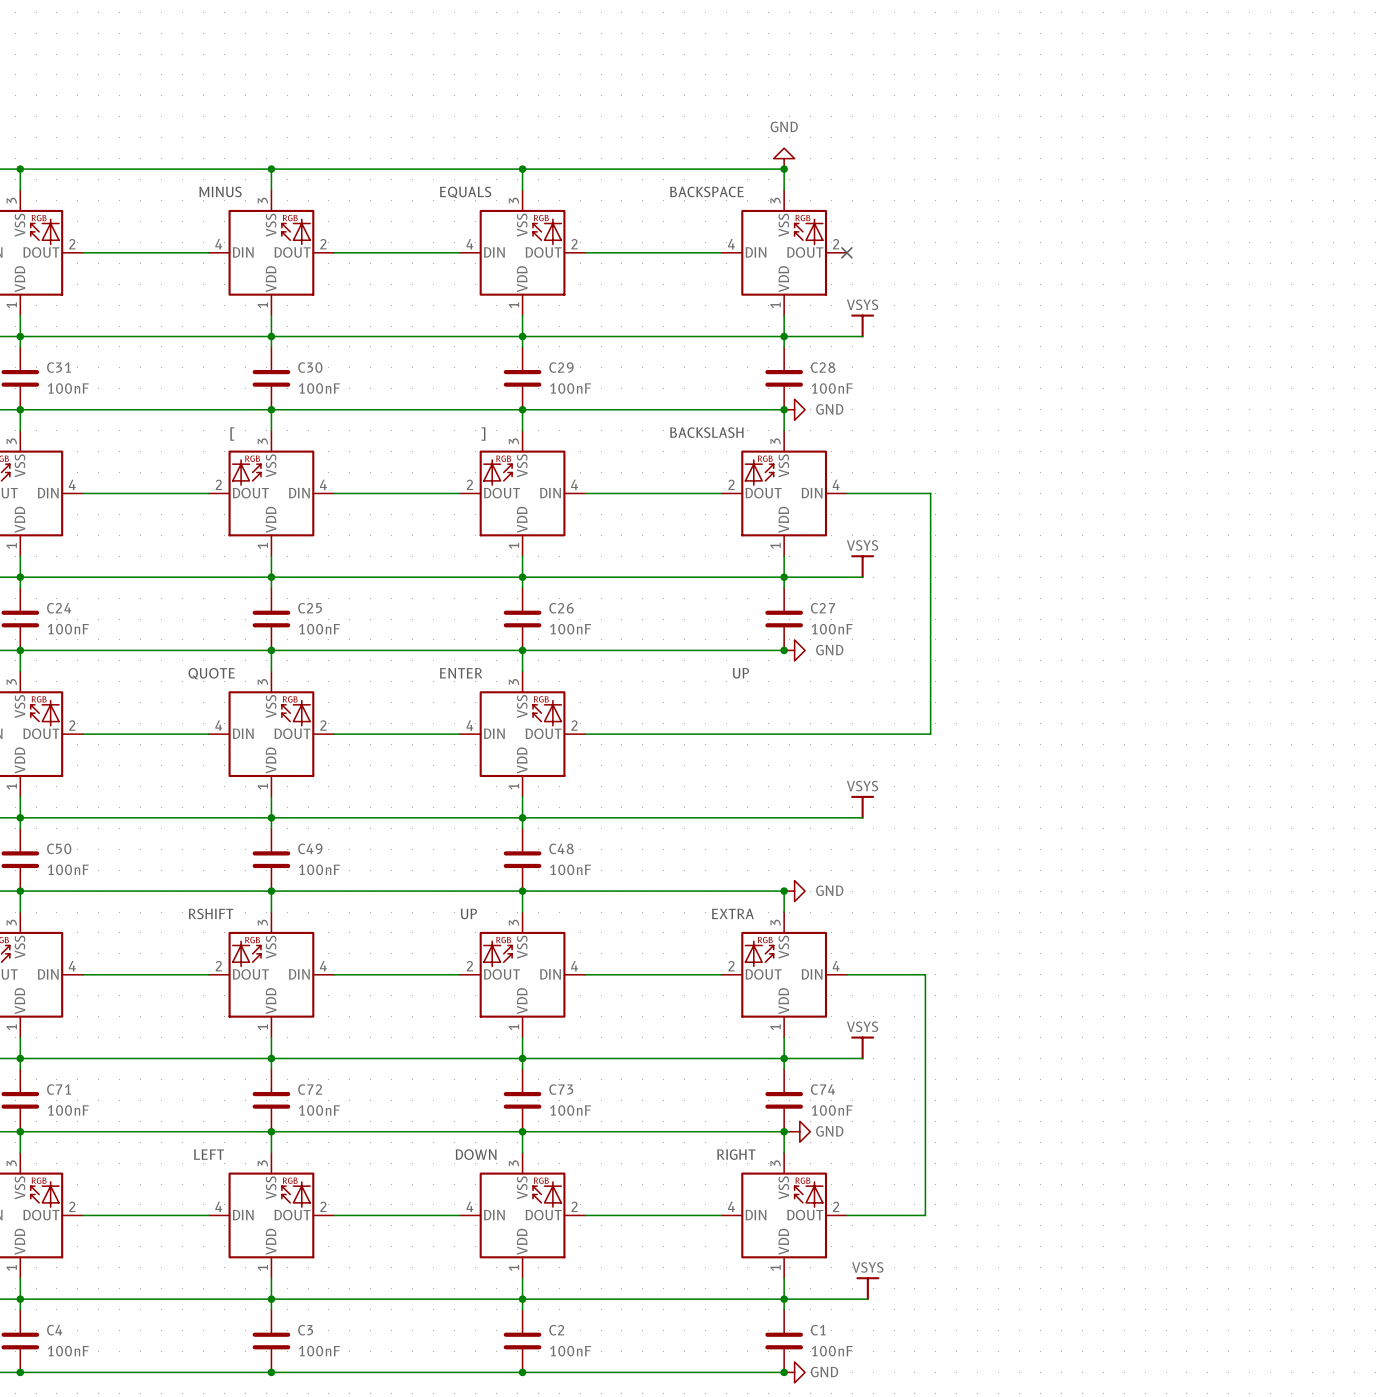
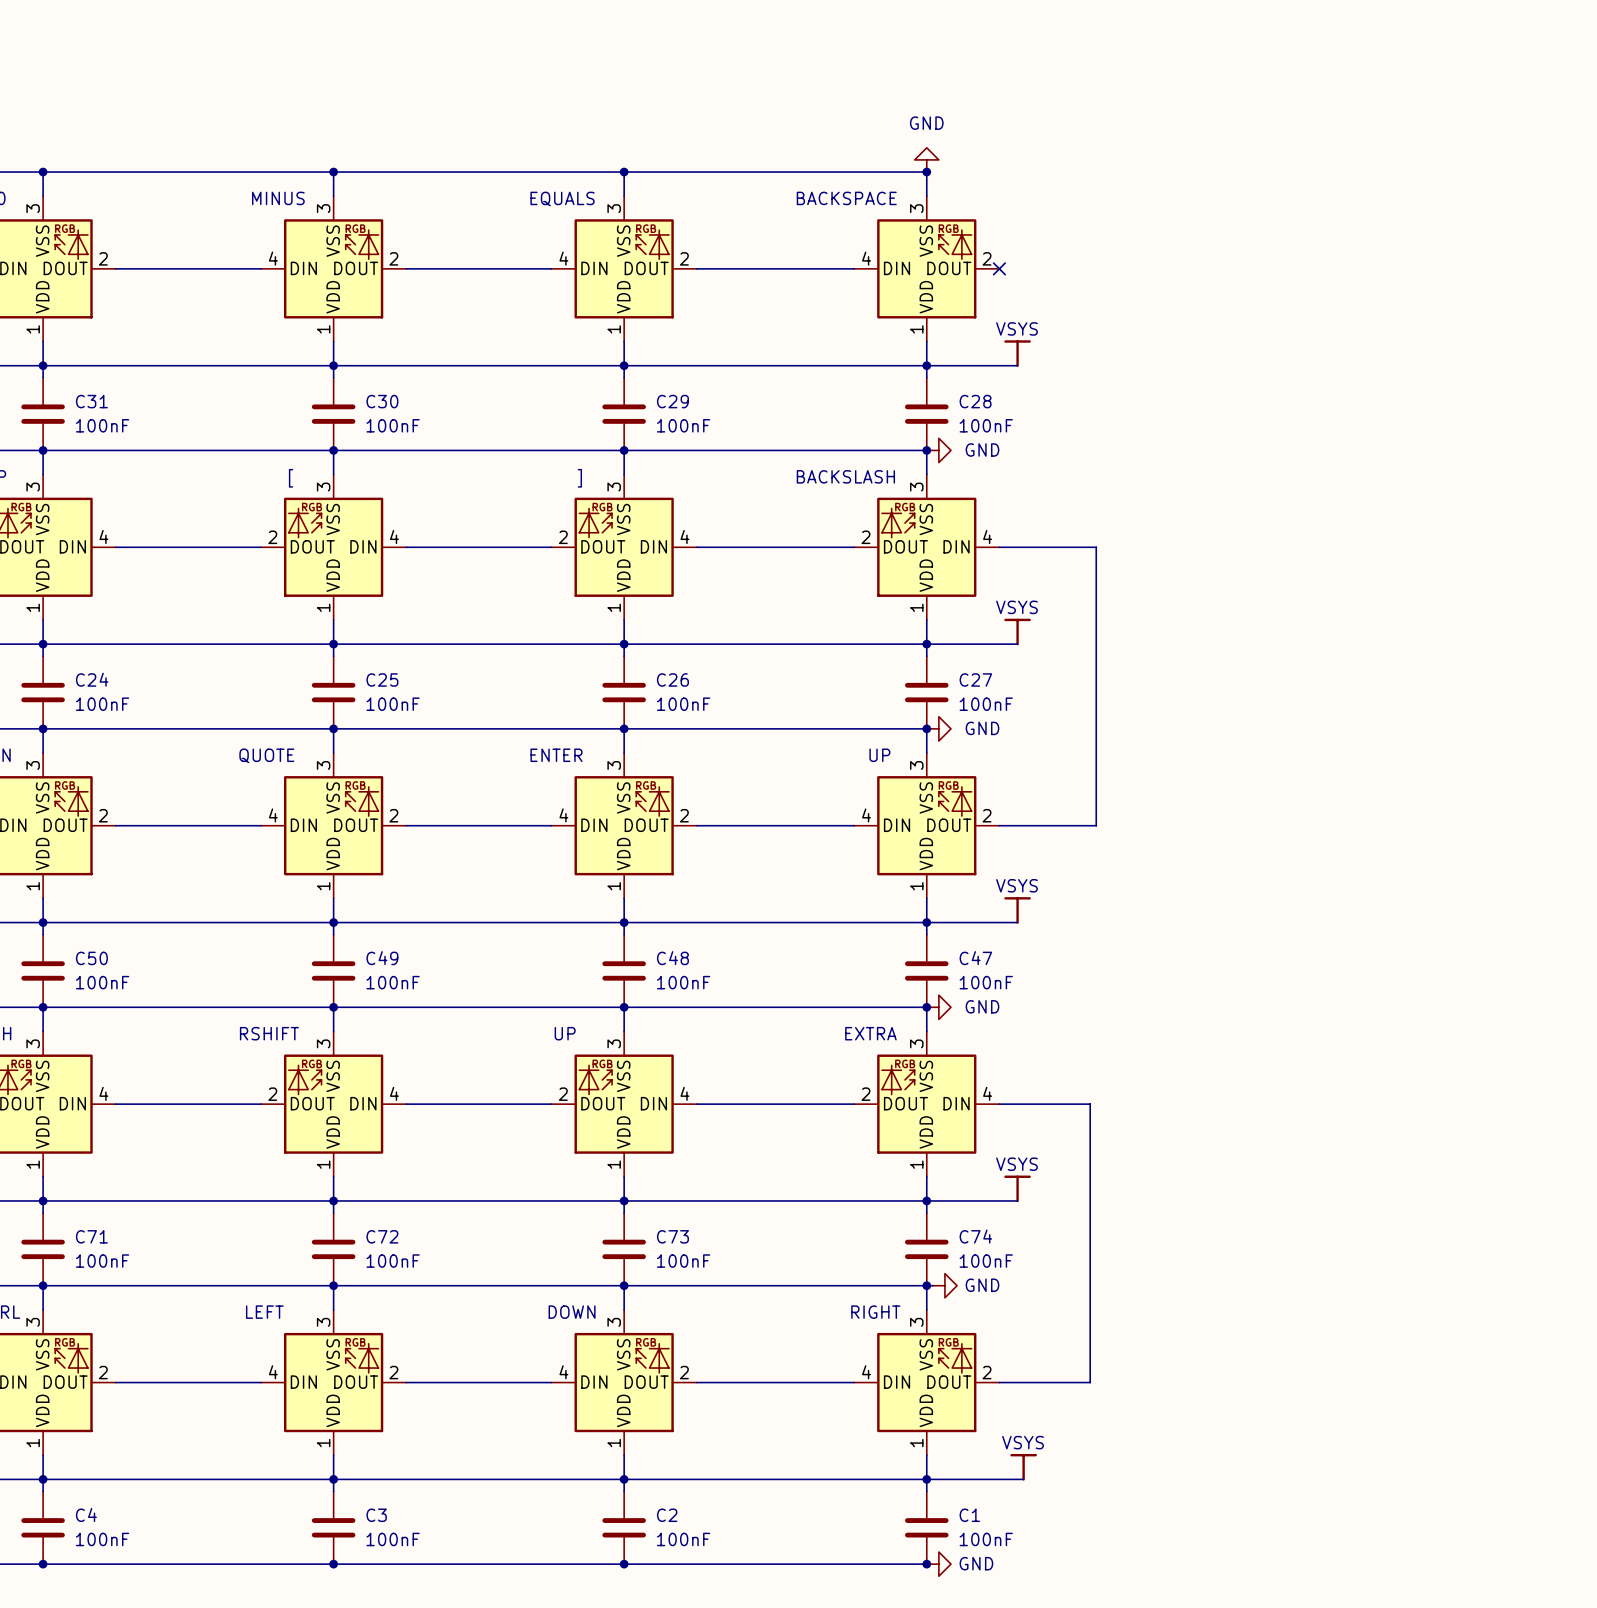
wire: none -> (926, 728) (926, 753)
part: none -> (926, 825)
wire: none -> (926, 898) (926, 934)
junction: none -> (926, 922)
C47: none -> 100nF (926, 970)

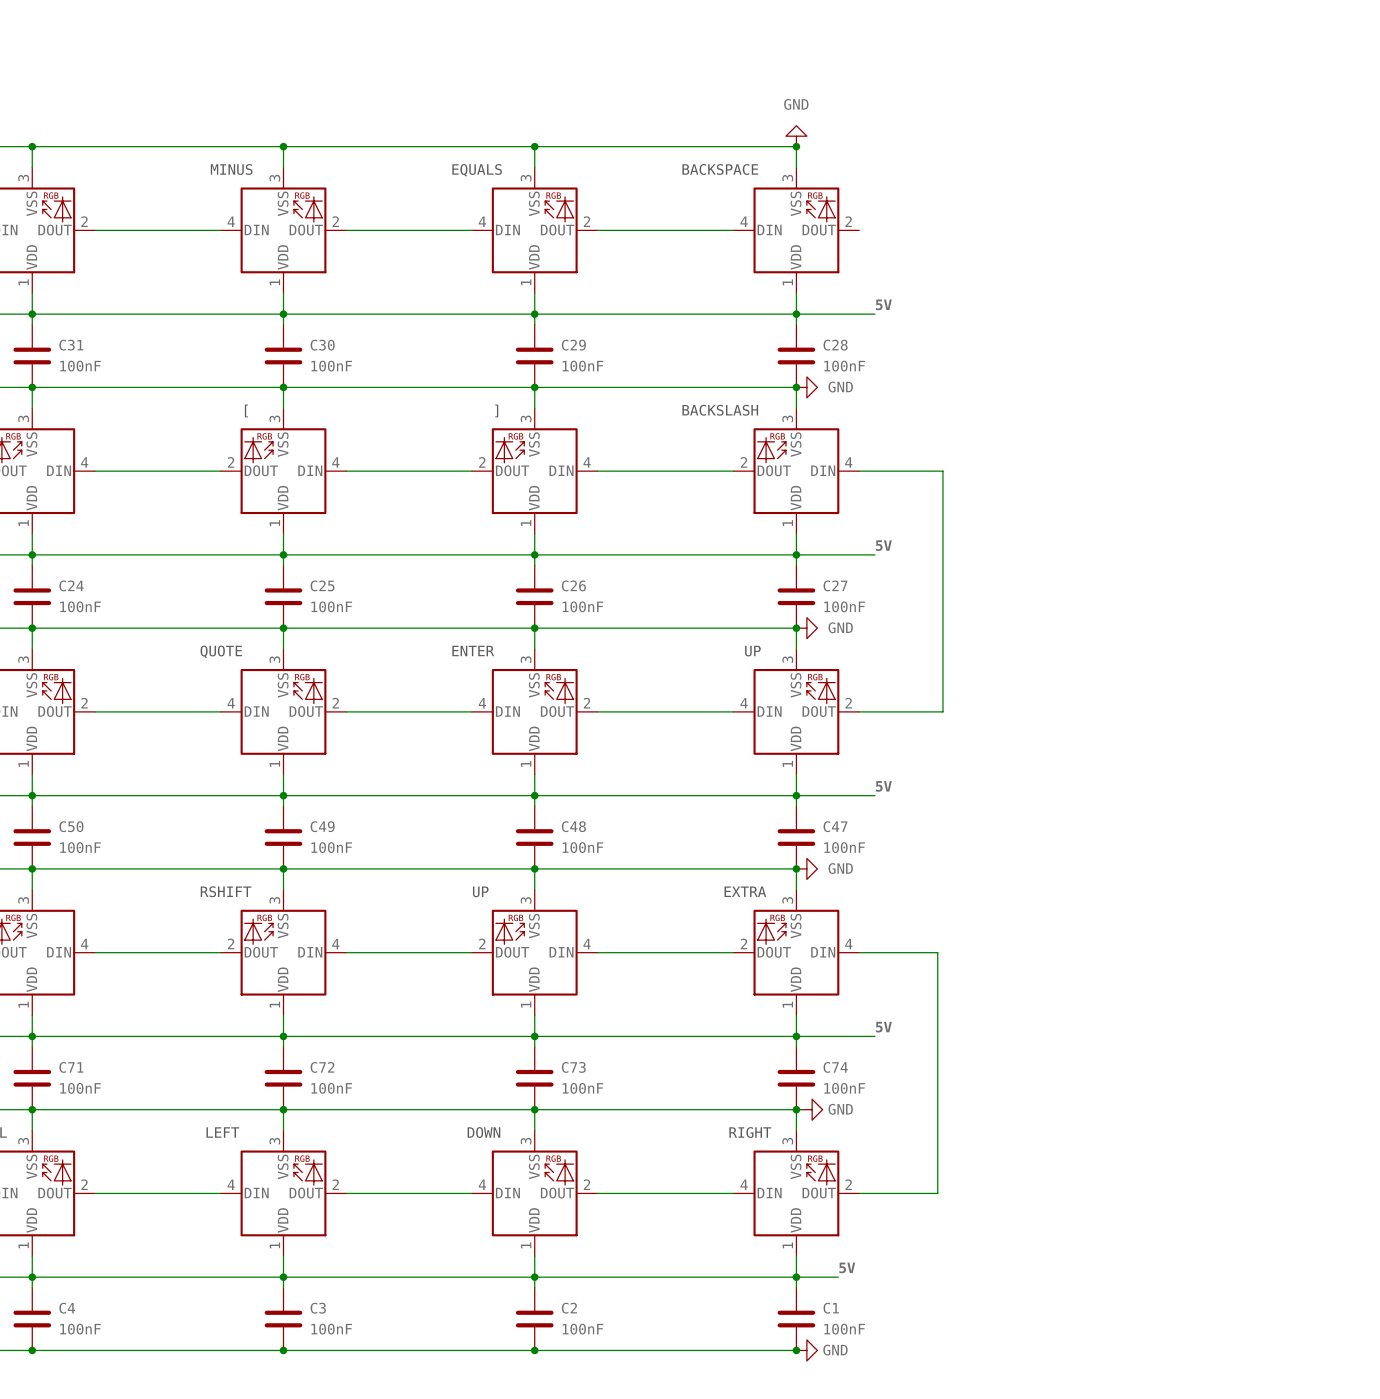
no-connect mark: (999, 268) -> none
power symbol: VSYS (1017, 353) -> none
label: none -> 5V (883, 304)
power symbol: VSYS (1017, 632) -> none
label: none -> 5V (883, 545)
power symbol: VSYS (1017, 910) -> none
label: none -> 5V (883, 786)
power symbol: VSYS (1017, 1188) -> none
label: none -> 5V (883, 1027)
power symbol: VSYS (1023, 1467) -> none
label: none -> 5V (847, 1267)
wire: (975, 1479) (1023, 1479) -> none

